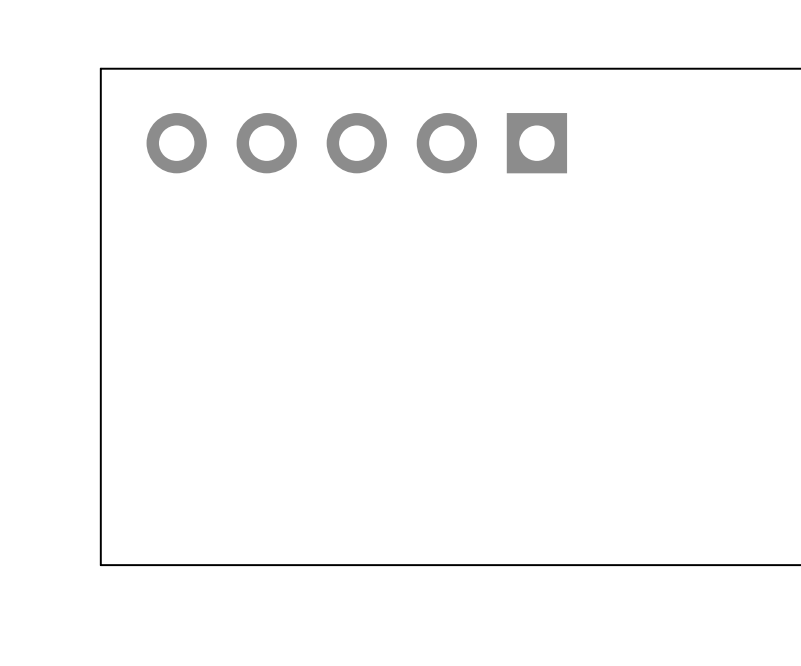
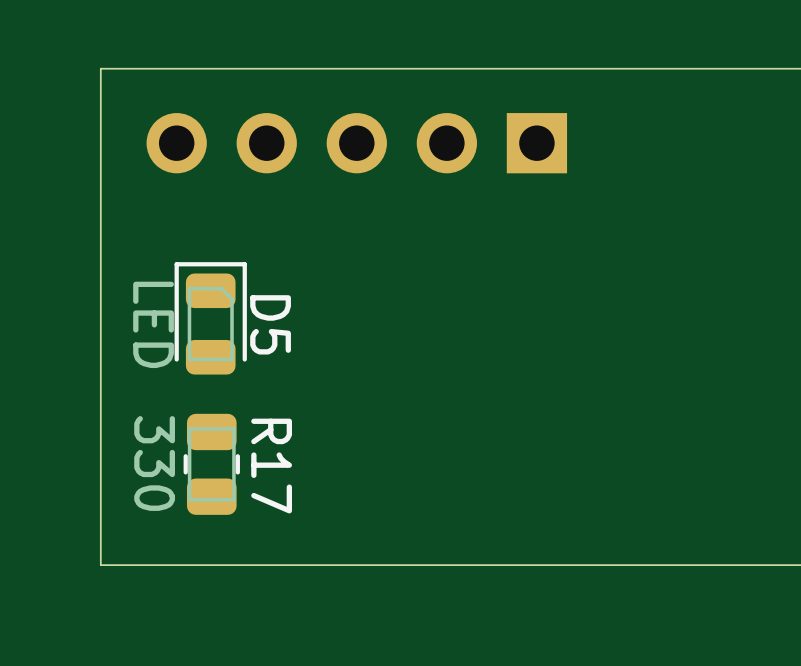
D5: none -> LED (210, 318)
R17: none -> 330 (211, 464)

